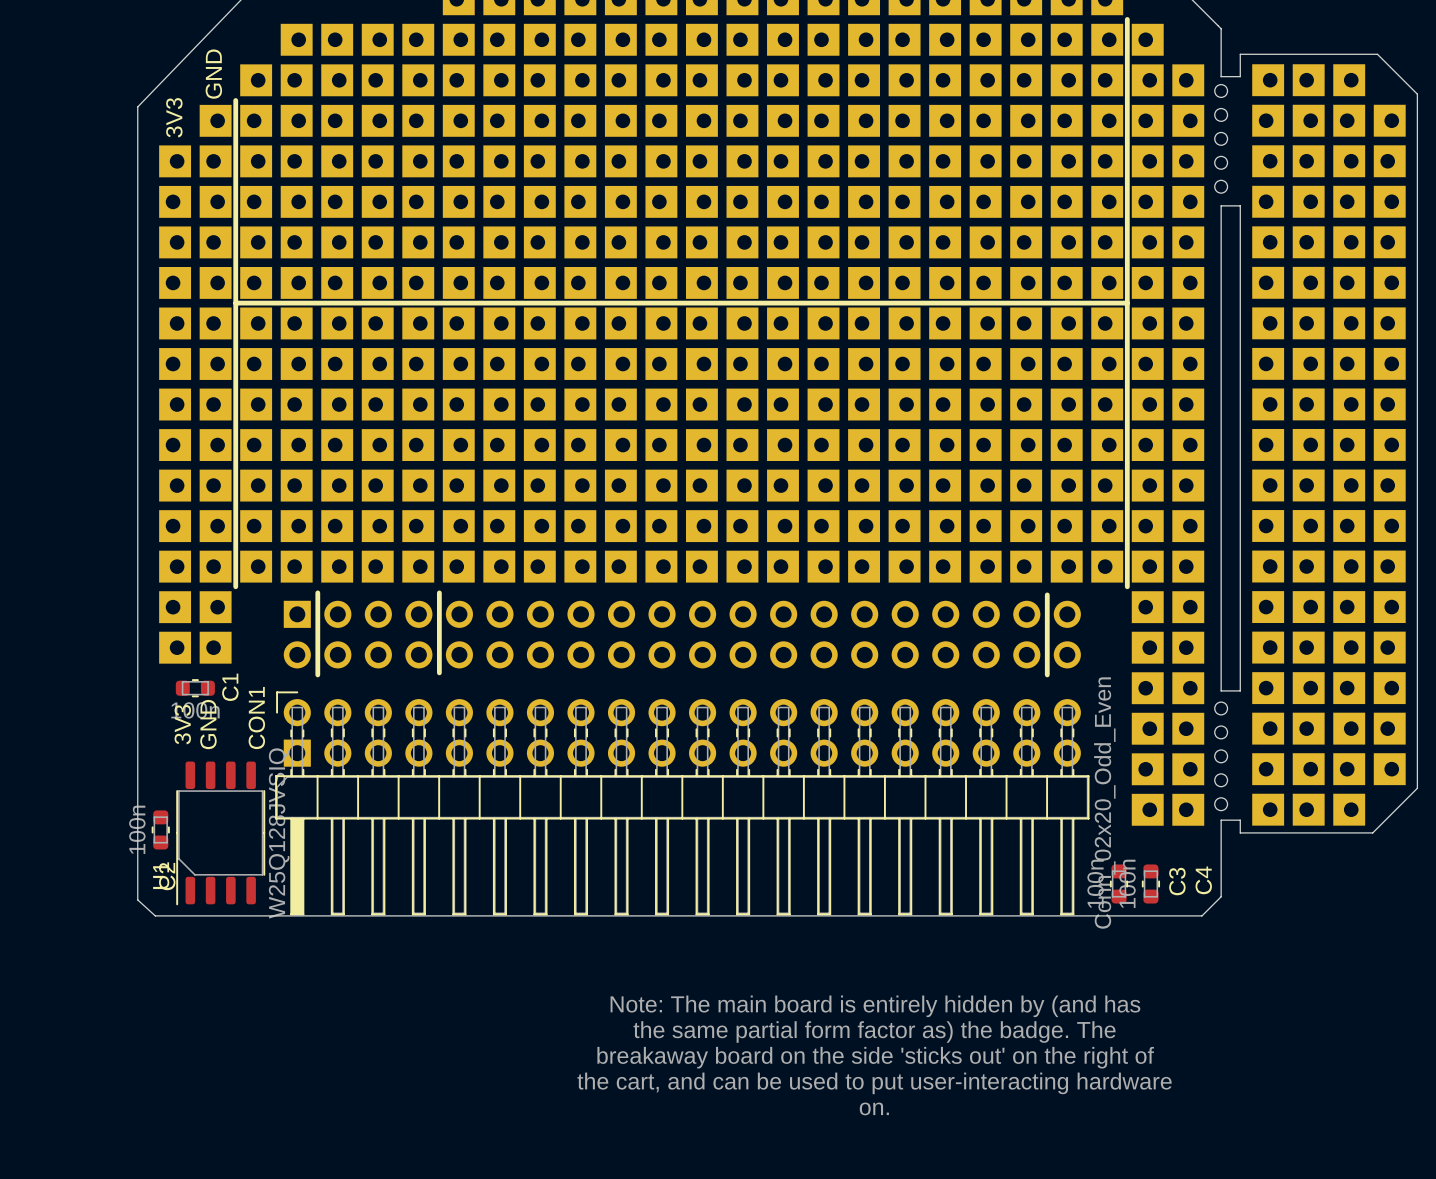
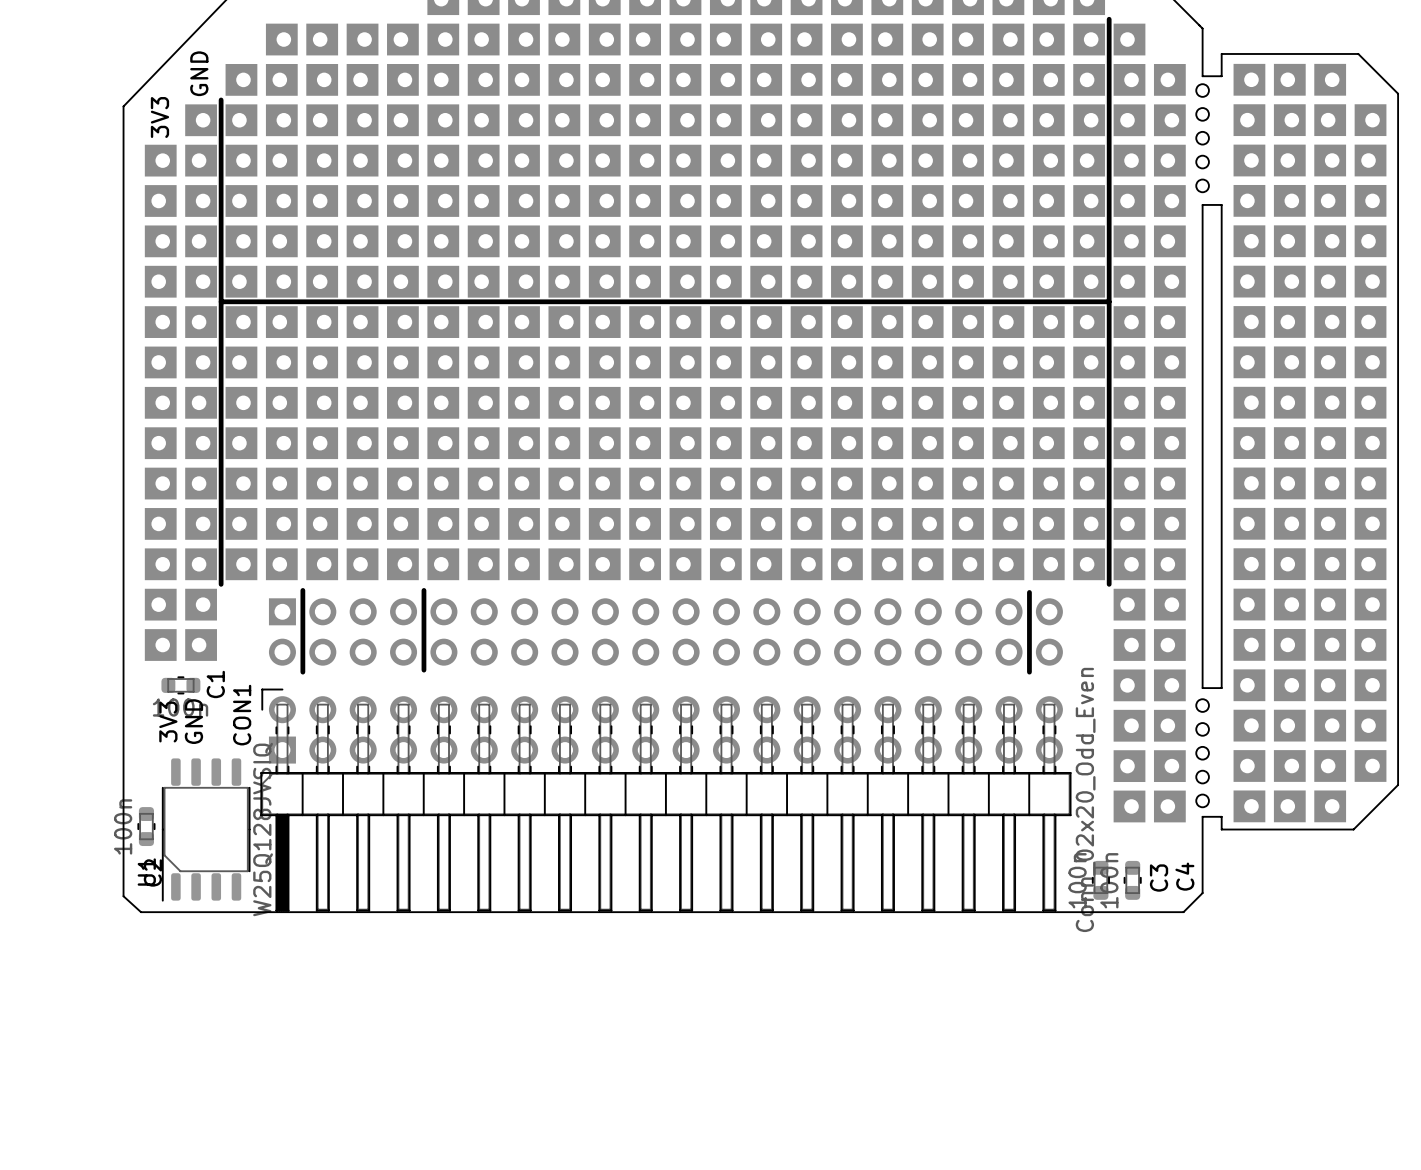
text: Note: The main board is entirely hidden by (and has (875, 1006) -> none
text: the same partial form factor as) the badge. The (874, 1032) -> none
text: breakaway board on the side 'sticks out' on the right of (875, 1057) -> none
text: the cart, and can be used to put user-interacting hardware (874, 1083) -> none
text: on. (874, 1108) -> none

